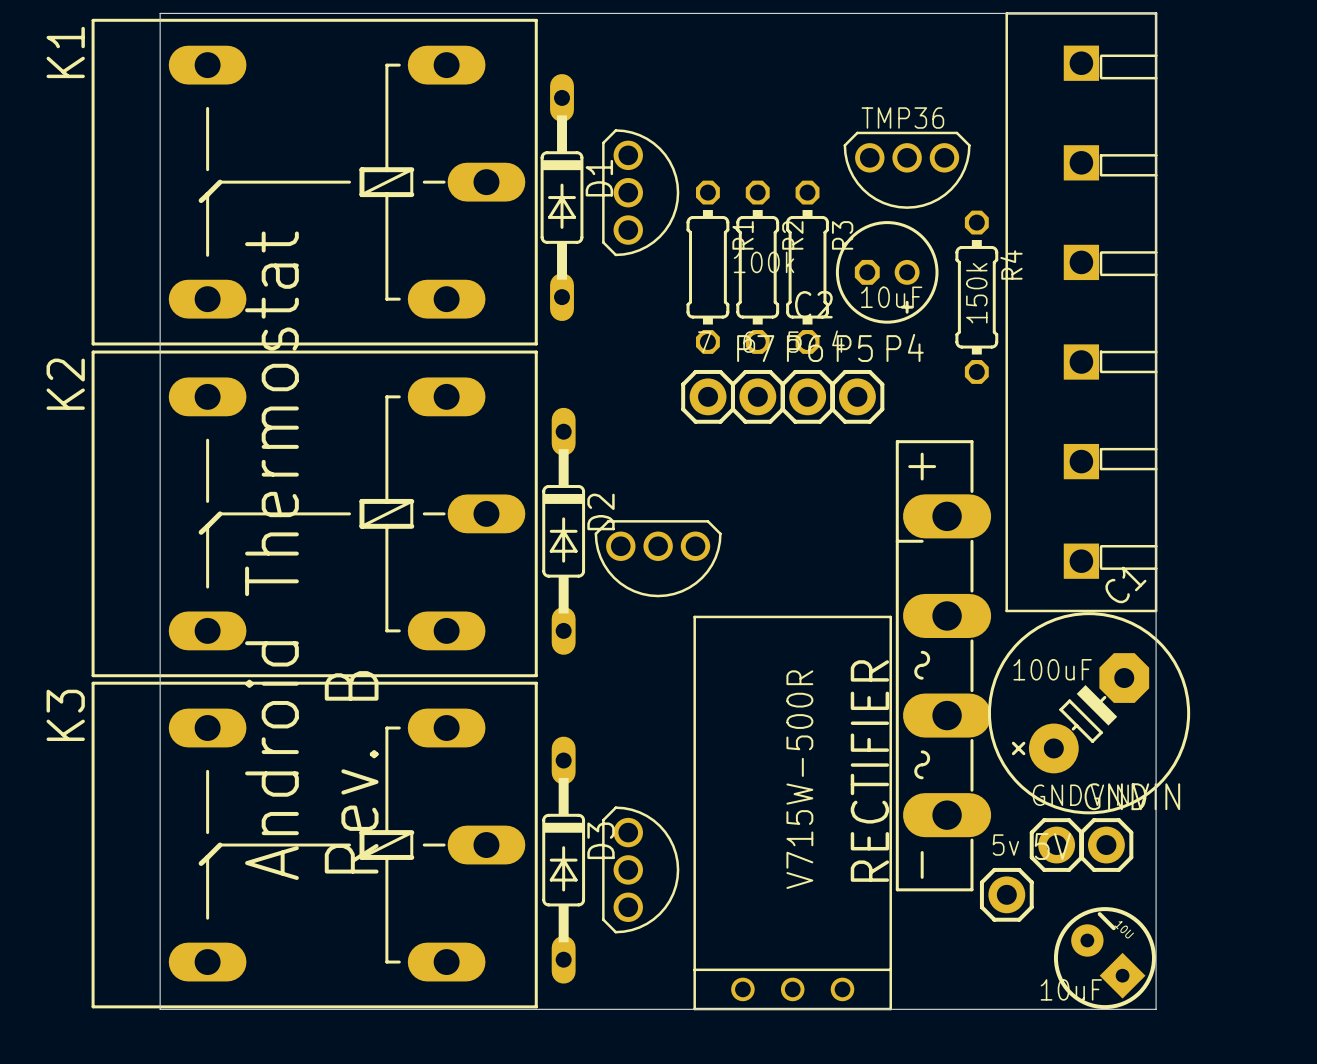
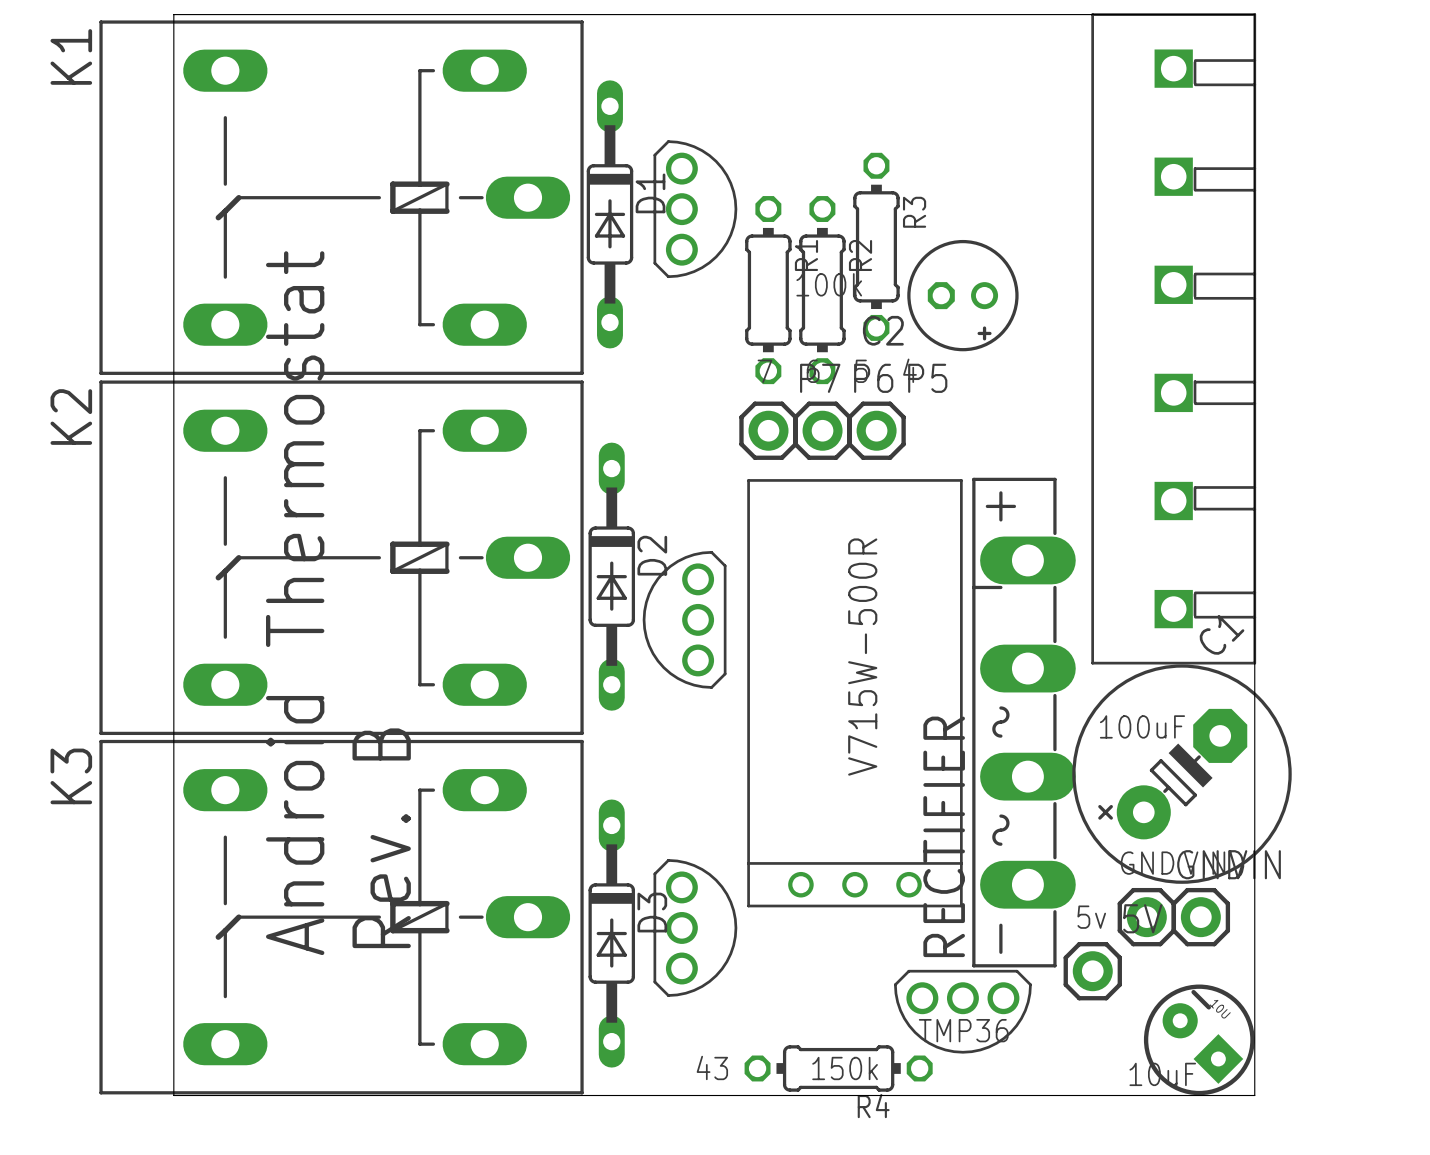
text: TMP36 (902, 118) -> none
part: (907, 170) -> none
R3 position: (807, 267) -> (876, 246)
text: 150k (976, 293) -> none
text: 10uF (891, 297) -> none
R4 rotation: 0° (976, 297) -> 90° clockwise (838, 1068)
R4 position: (976, 297) -> (838, 1068)
P4: (857, 396) -> none
part rotation: 0° (658, 558) -> 90° clockwise (684, 619)
part position: (792, 812) -> (854, 693)
part position: (640, 869) -> (695, 927)
part: none -> (962, 1011)
text: none -> TMP36 (963, 1030)
text: none -> 43 (712, 1067)
text: none -> 150k (845, 1068)

